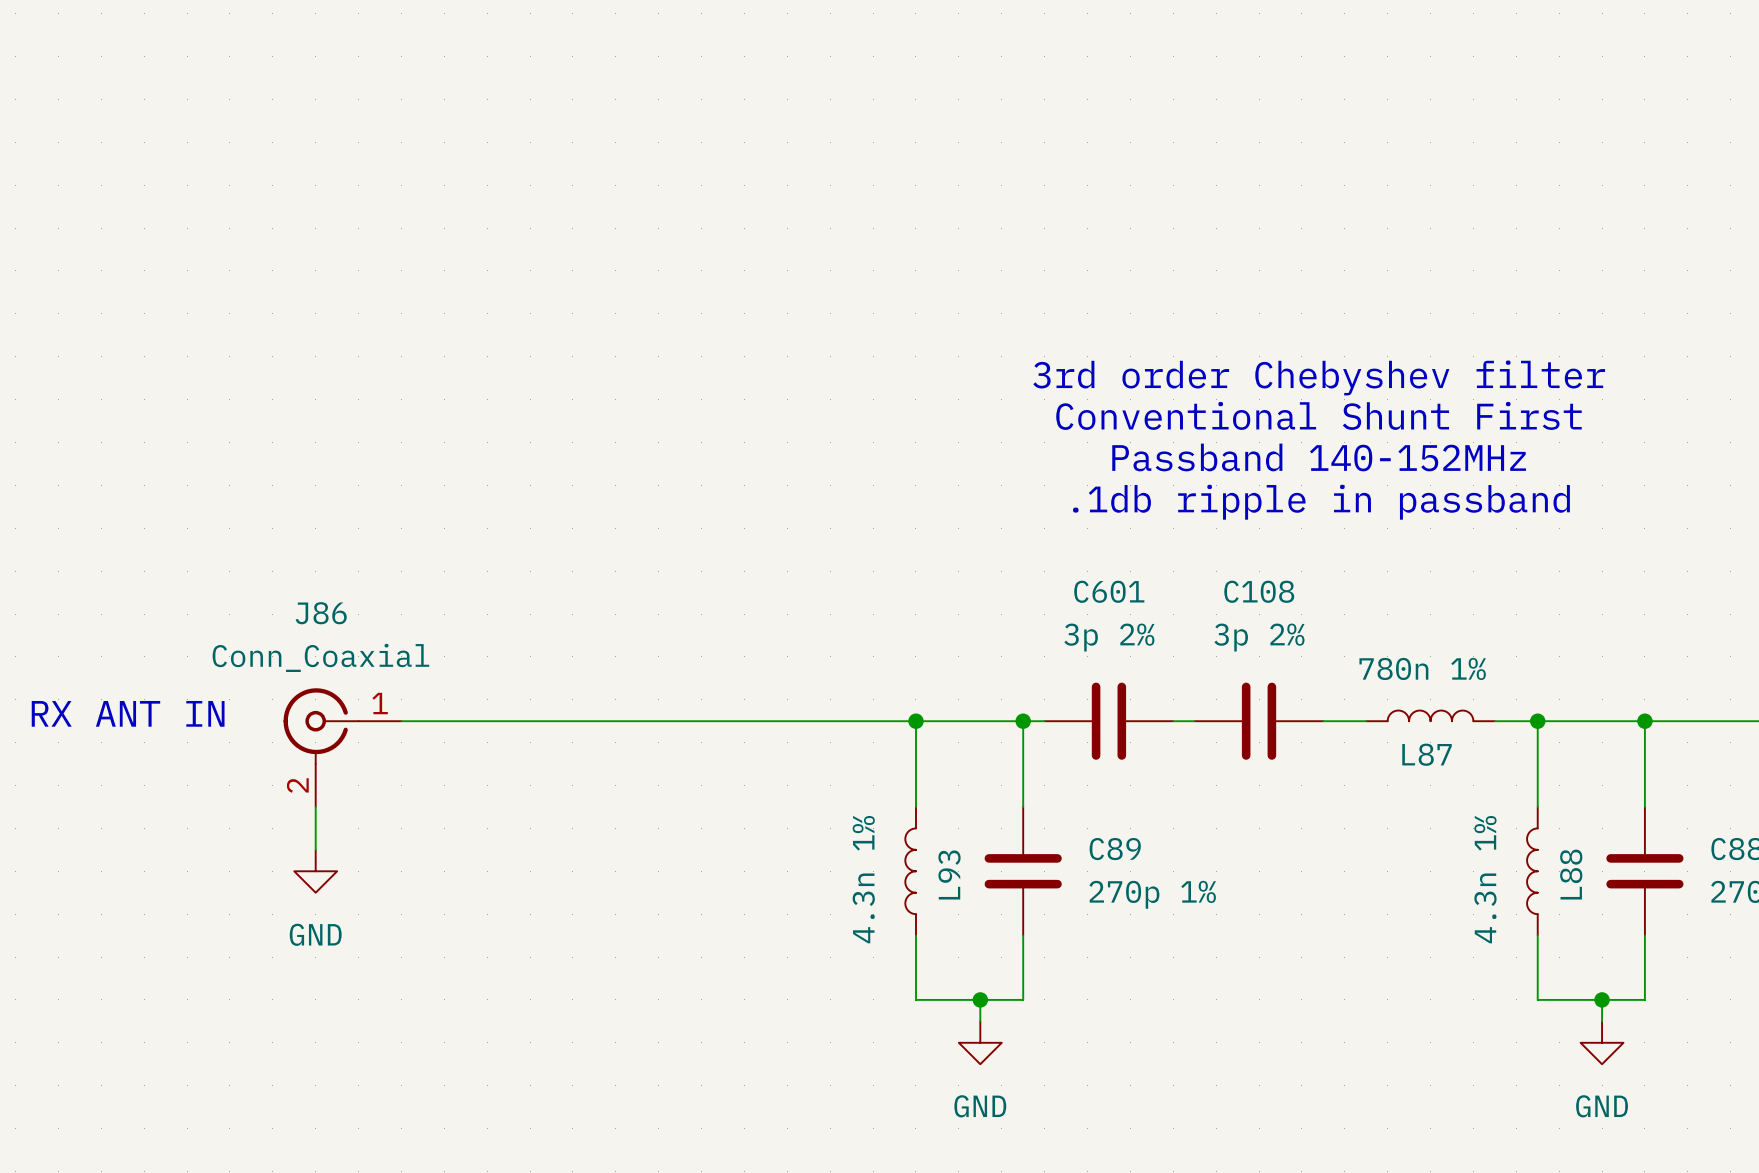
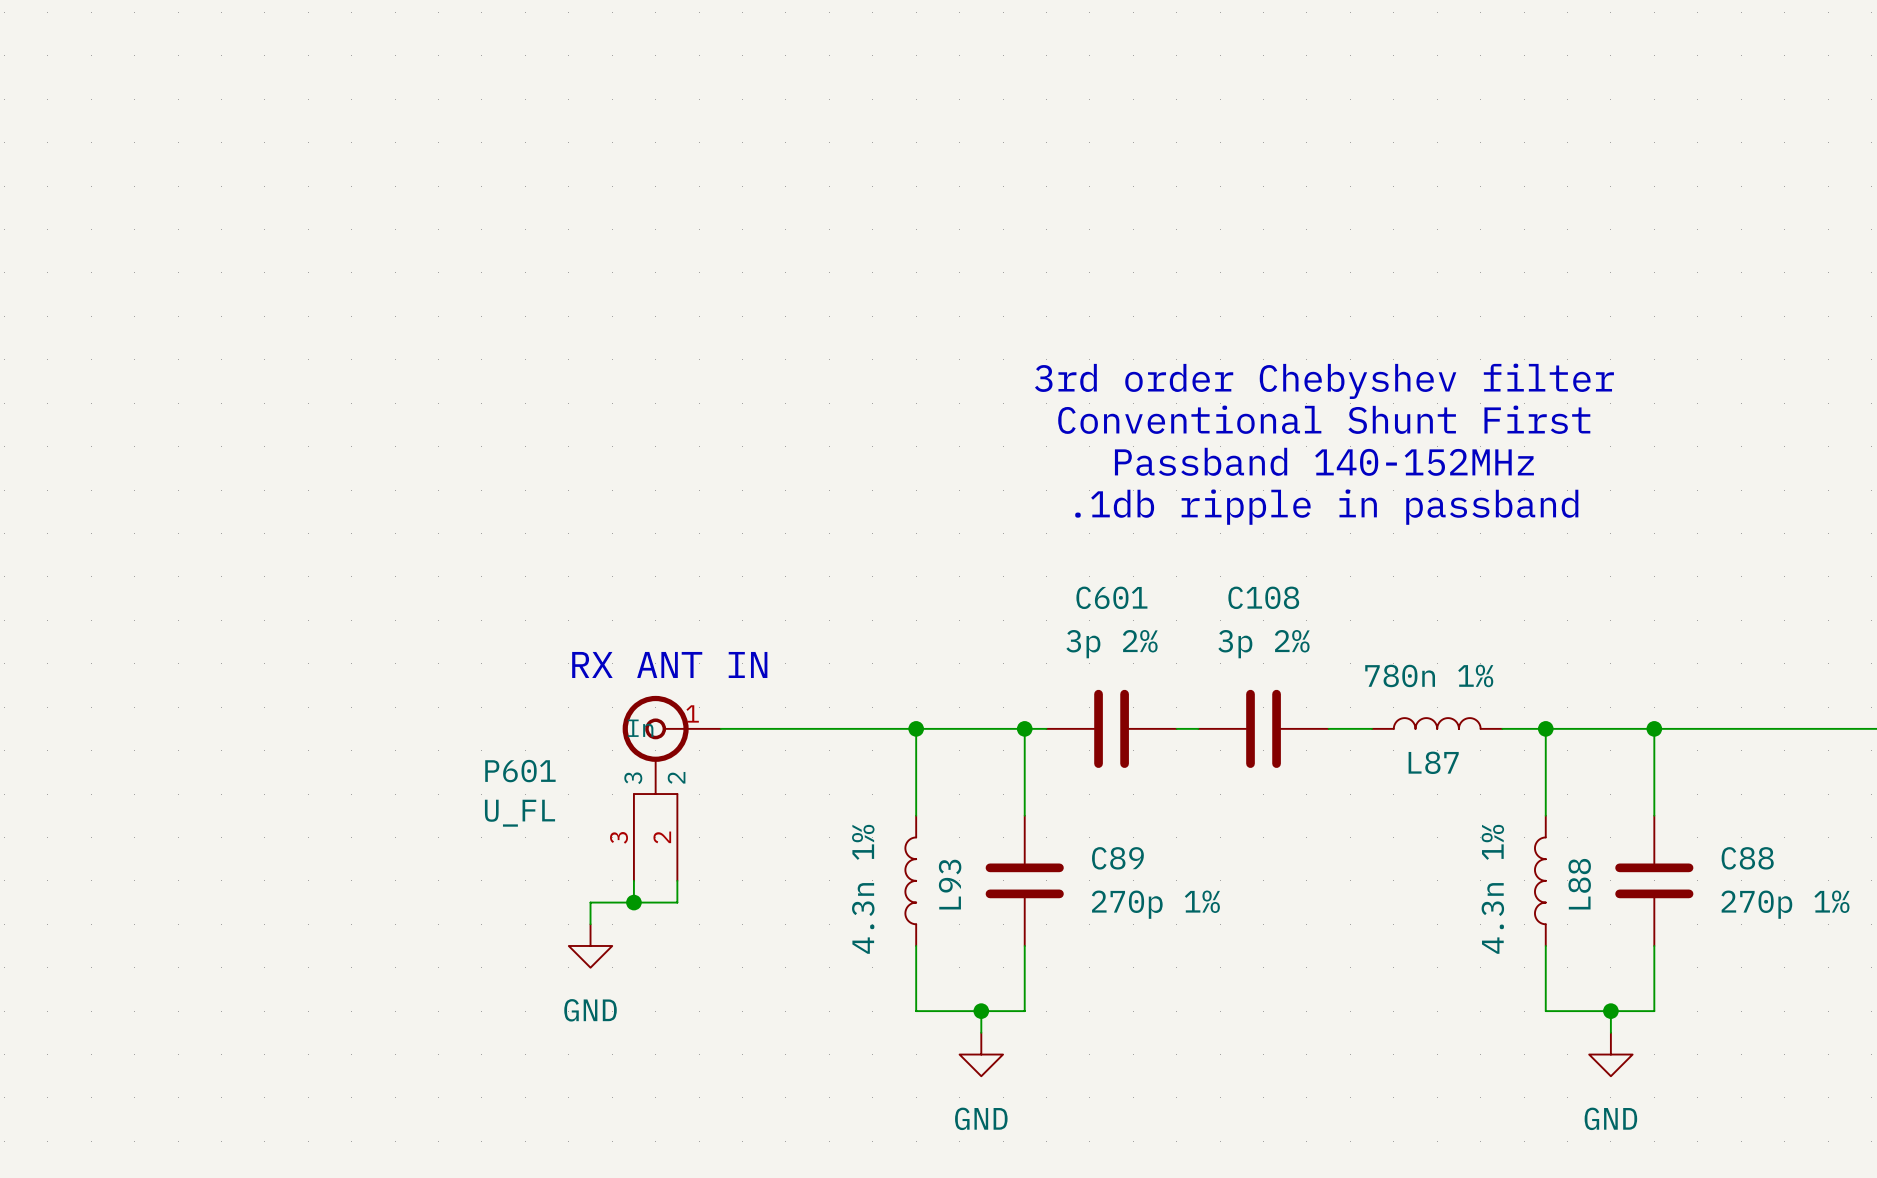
text: none -> RX ANT IN (669, 664)
text: RX ANT IN (128, 713) -> none
wire: (401, 721) (723, 721) -> none
J86: Conn_Coaxial (342, 747) -> none
P601: none -> U_FL (671, 788)
wire: (315, 806) (315, 849) -> none
power symbol position: GND (315, 871) -> GND (590, 945)
wire: none -> (633, 880) (633, 902)
wire: none -> (677, 880) (677, 902) (590, 902) (590, 924)
junction: none -> (633, 902)

